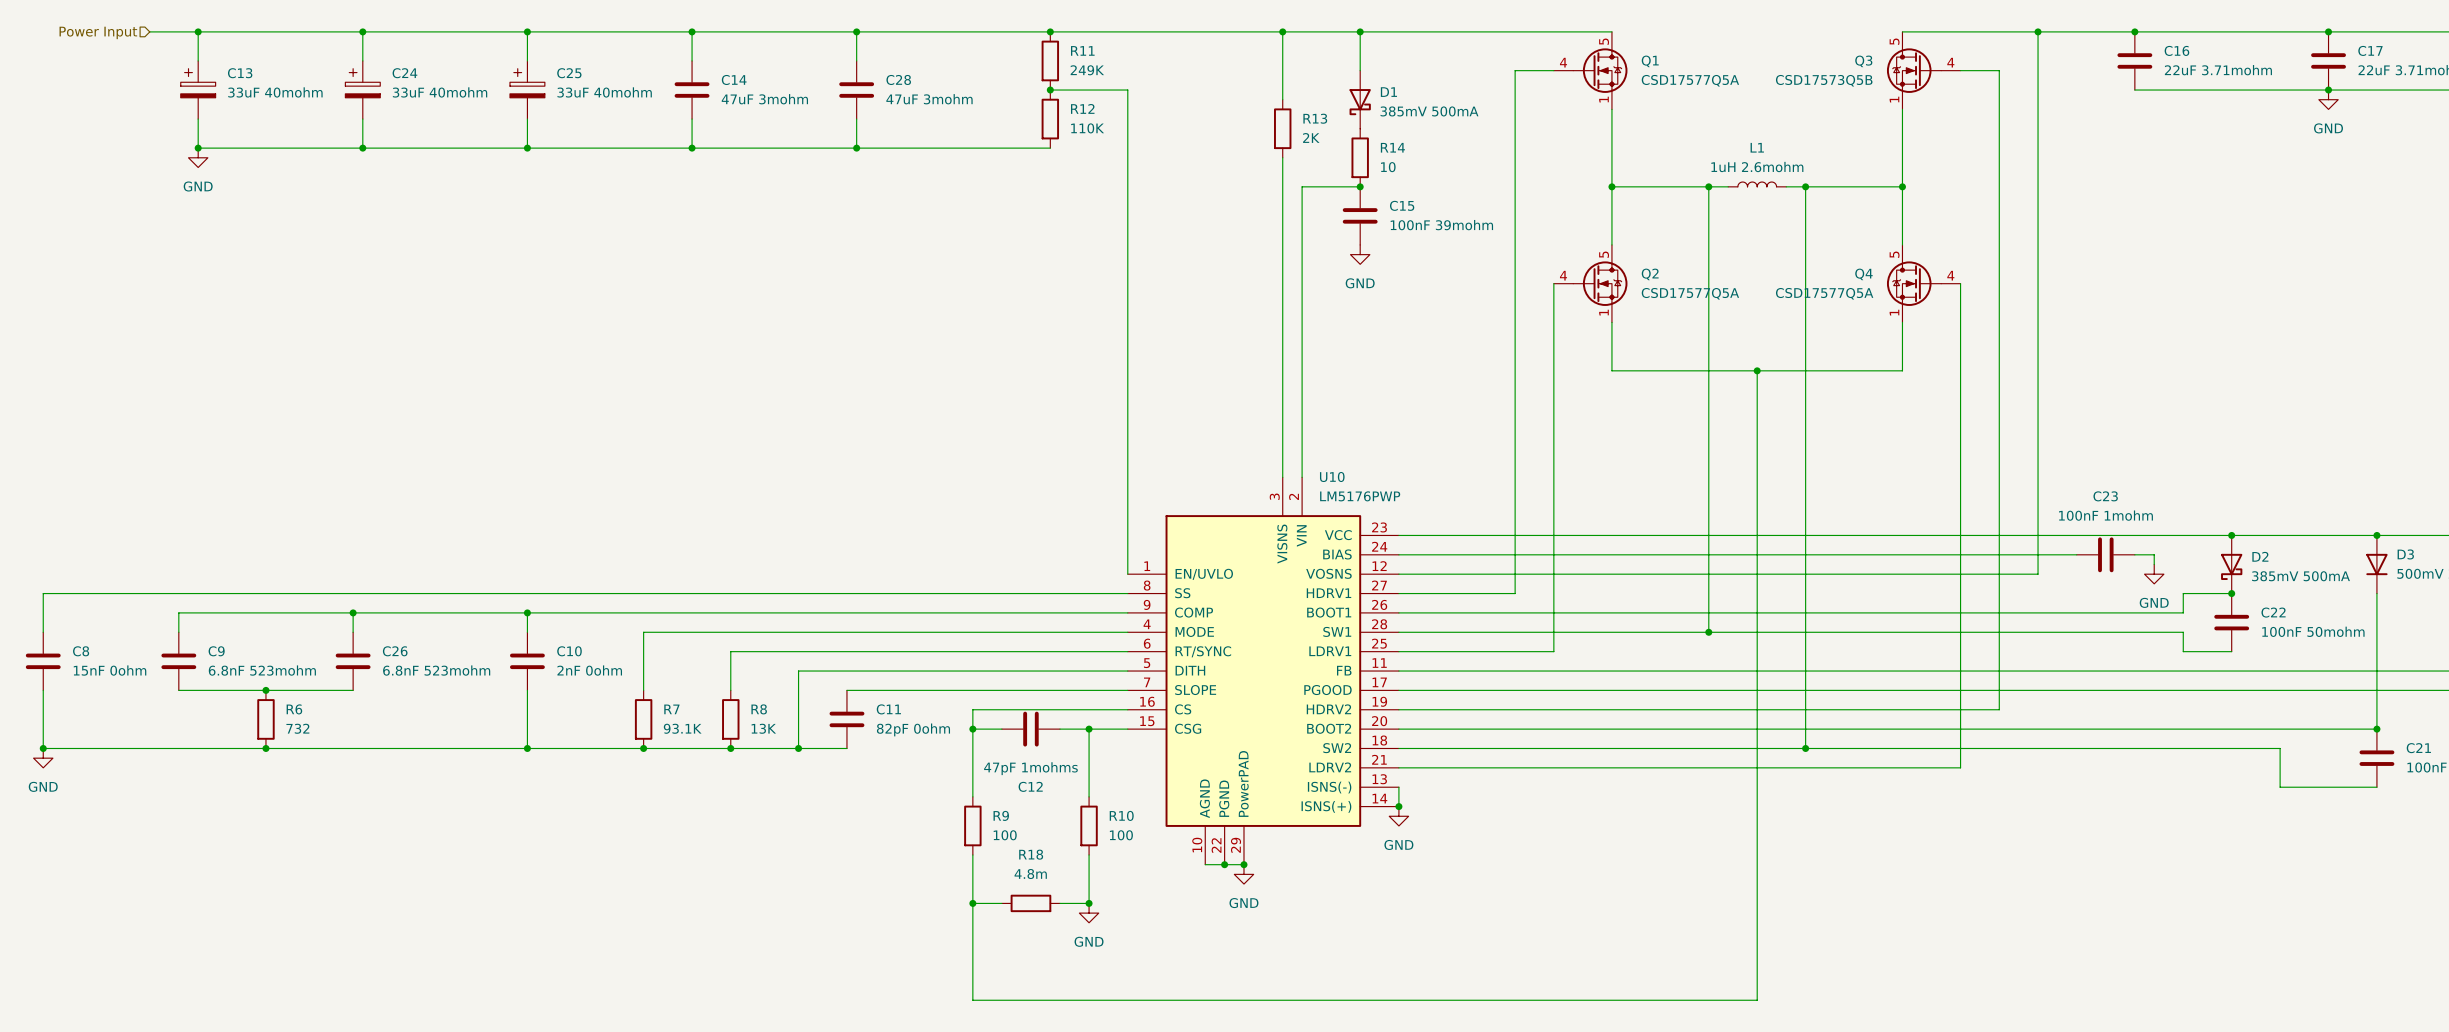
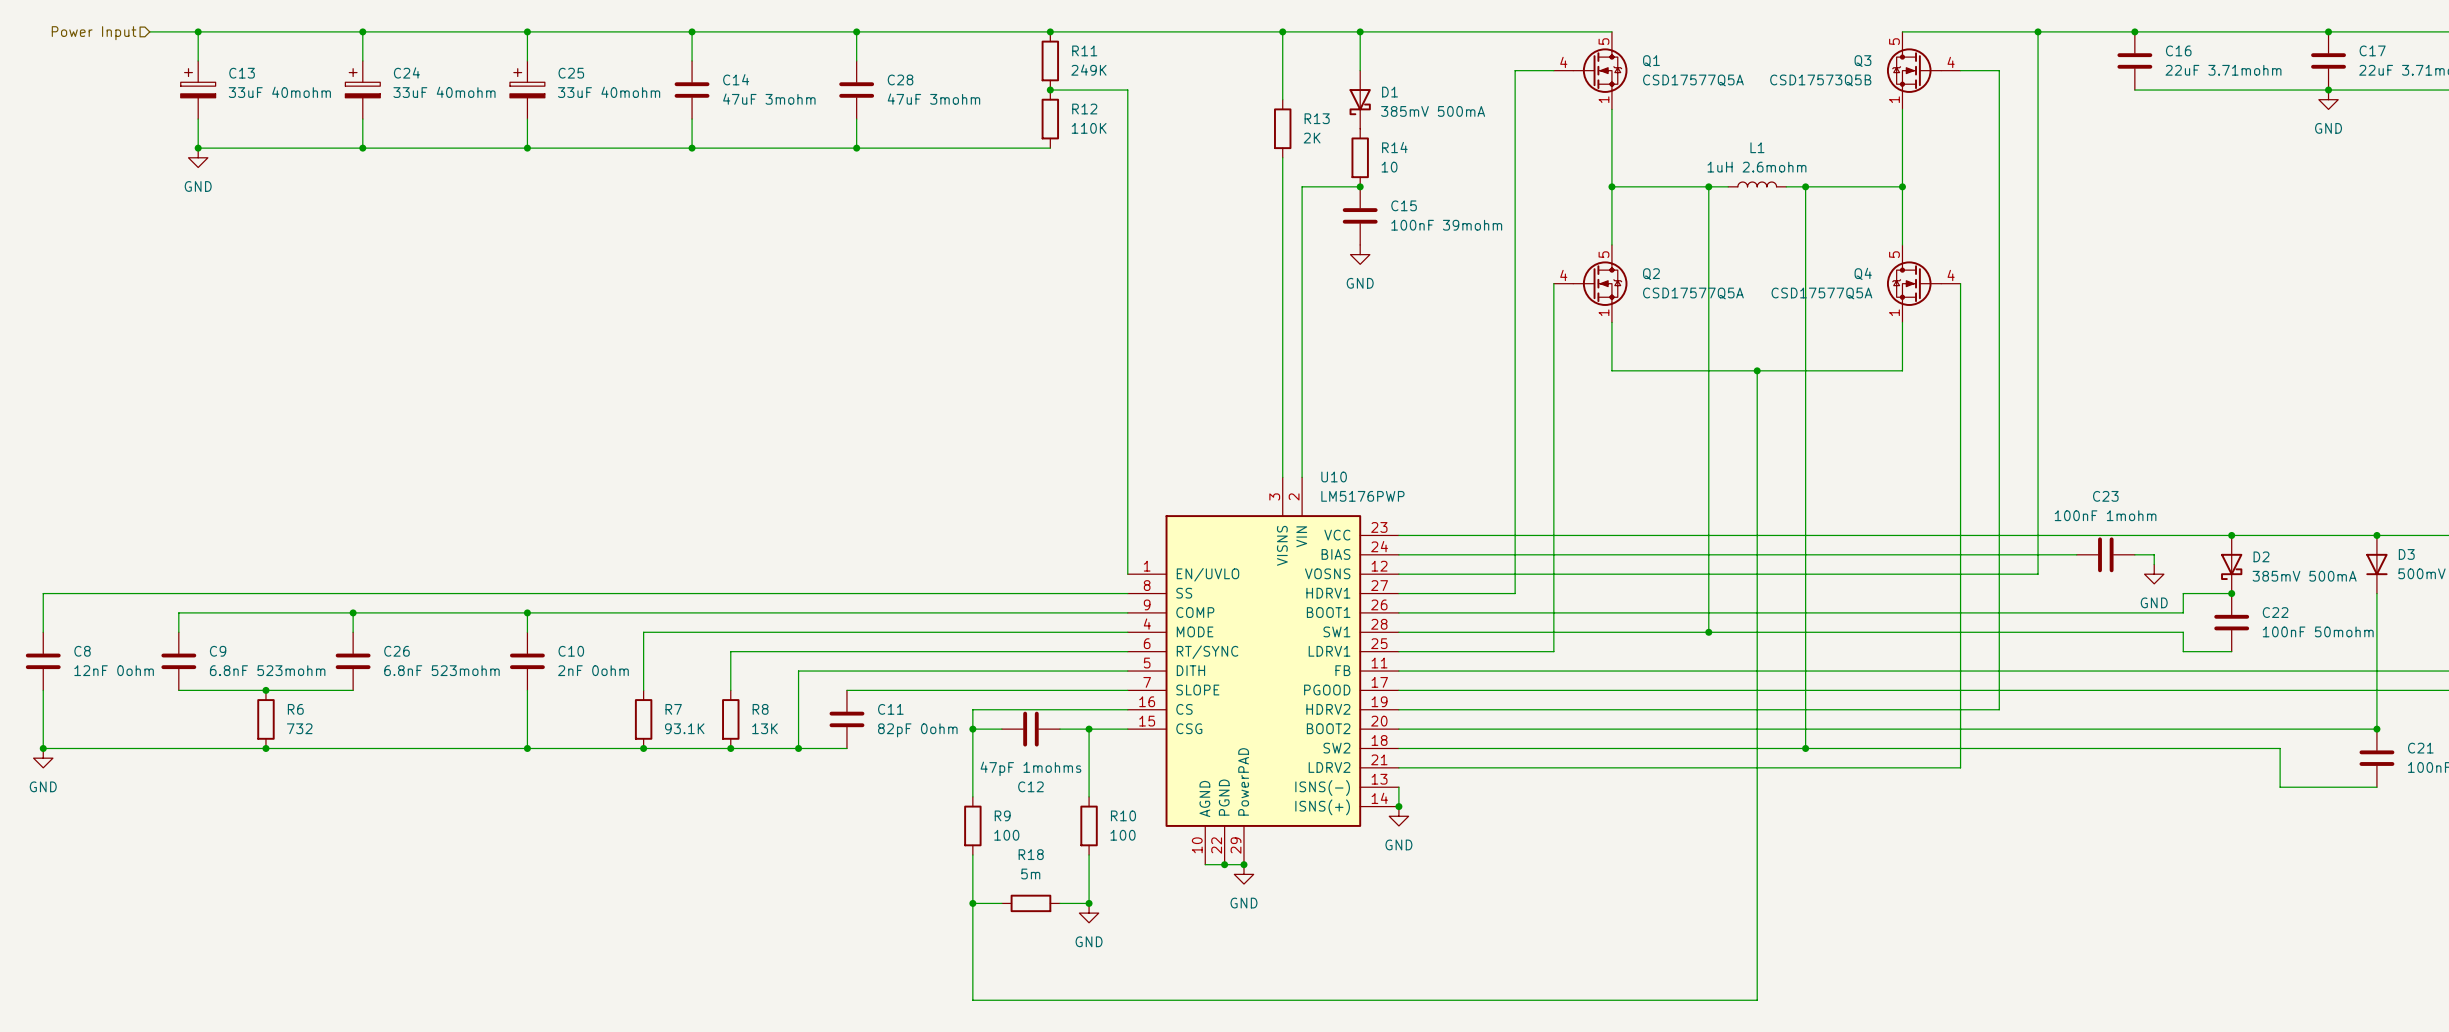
C8 value: 15nF 0ohm (110, 670) -> 12nF 0ohm (114, 670)
R18 value: 4.8m (1030, 874) -> 5m (1030, 874)

